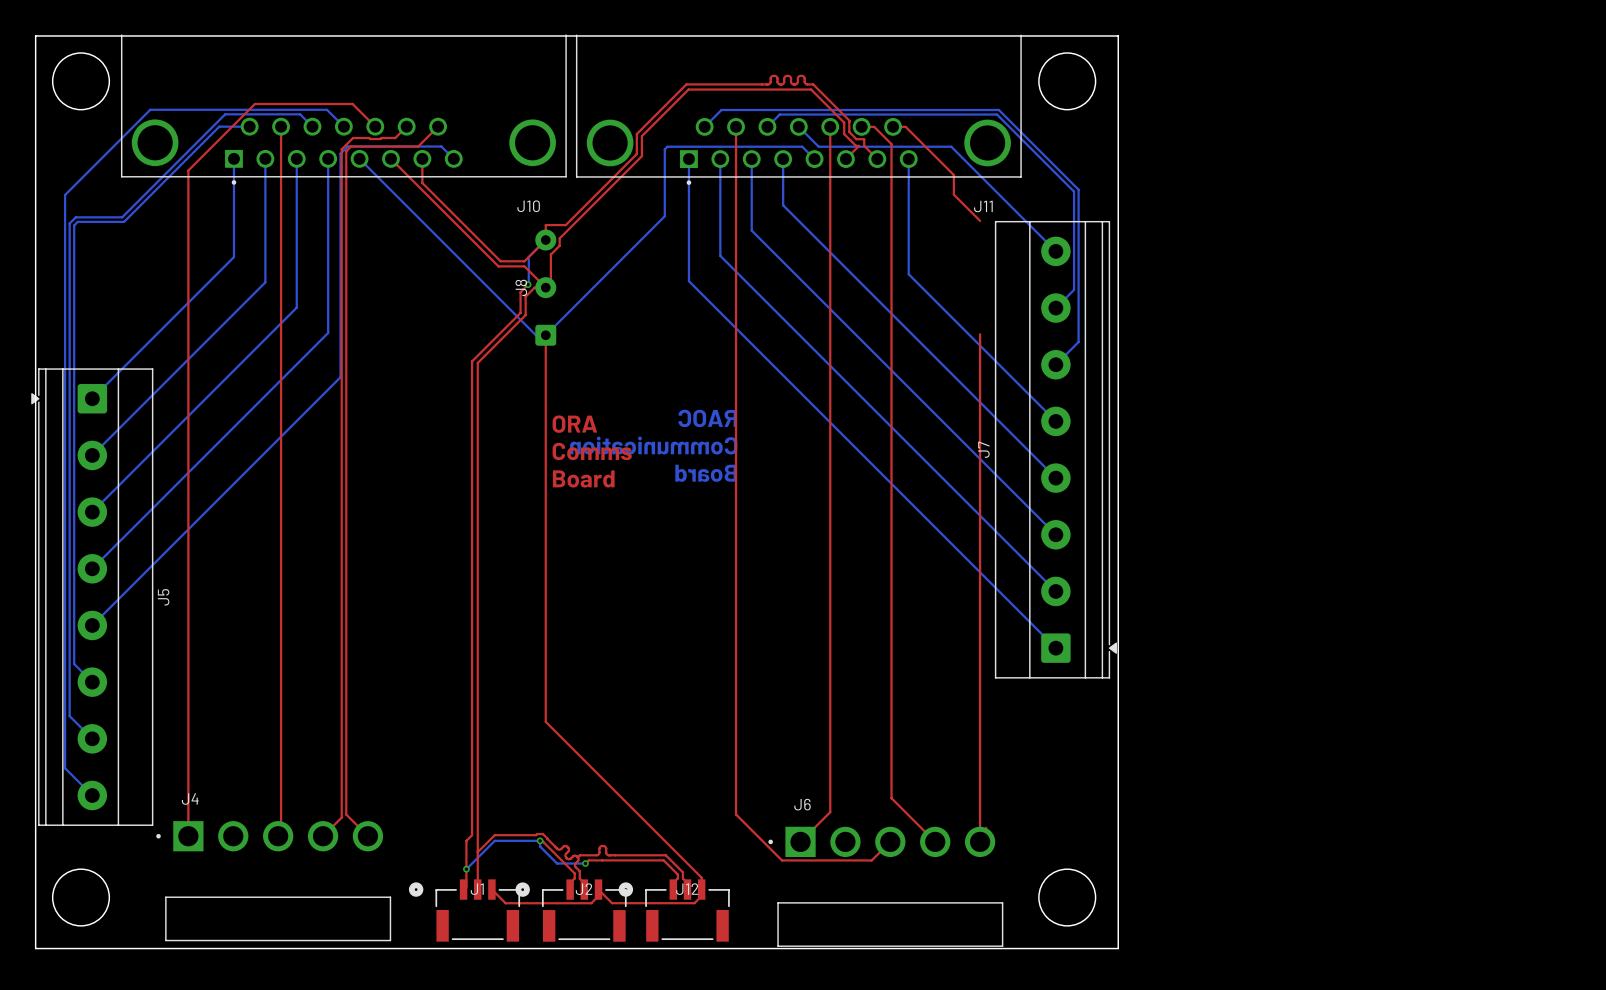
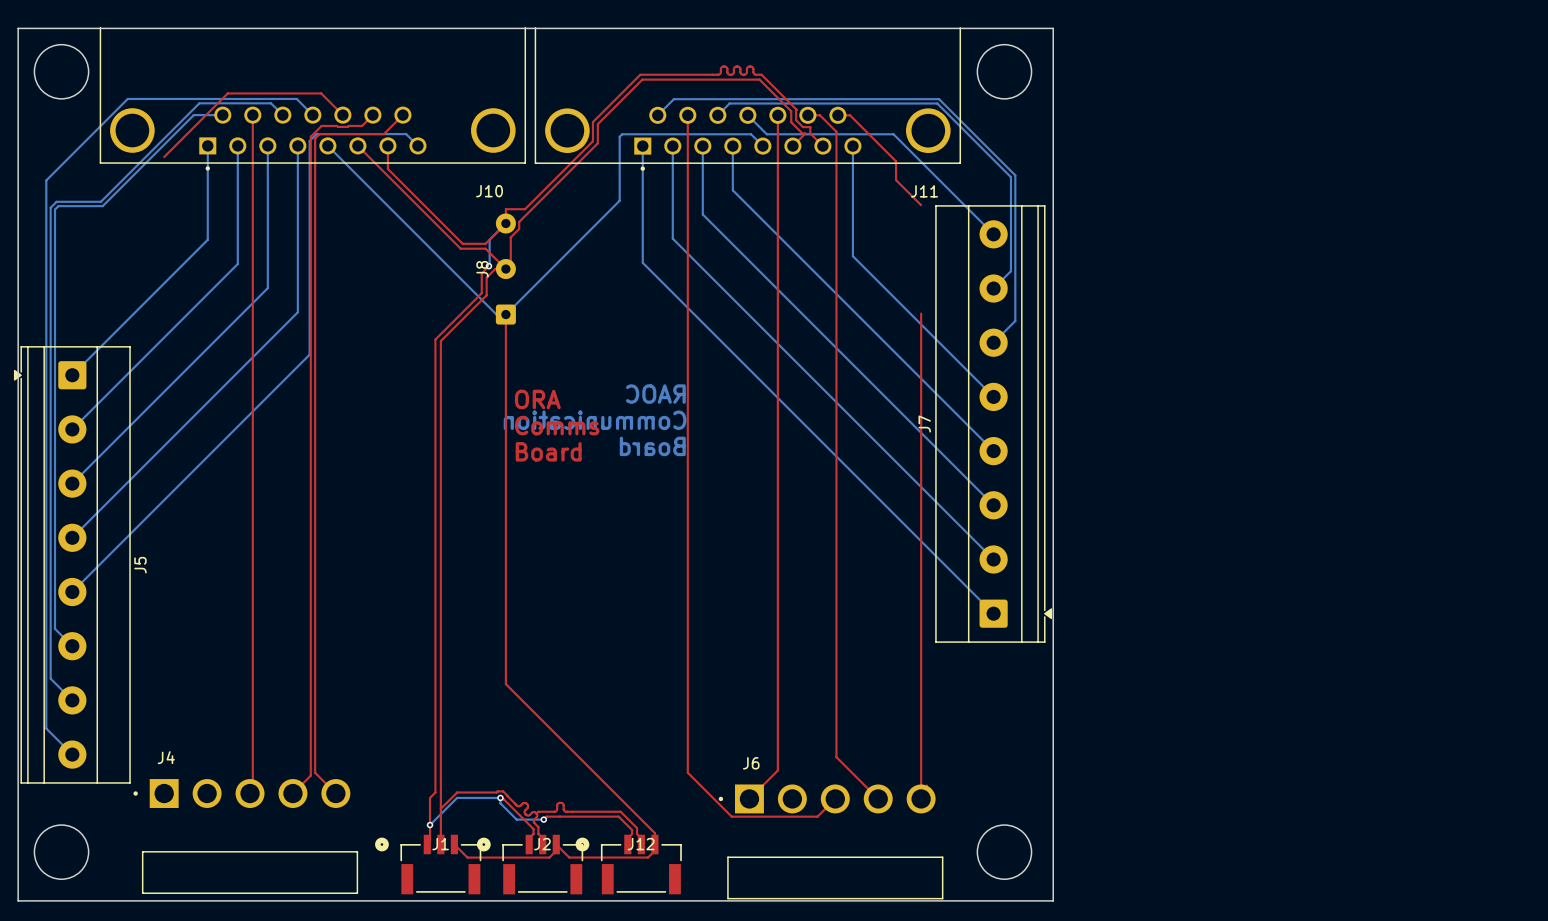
top track: (188, 170) (188, 836) -> none

